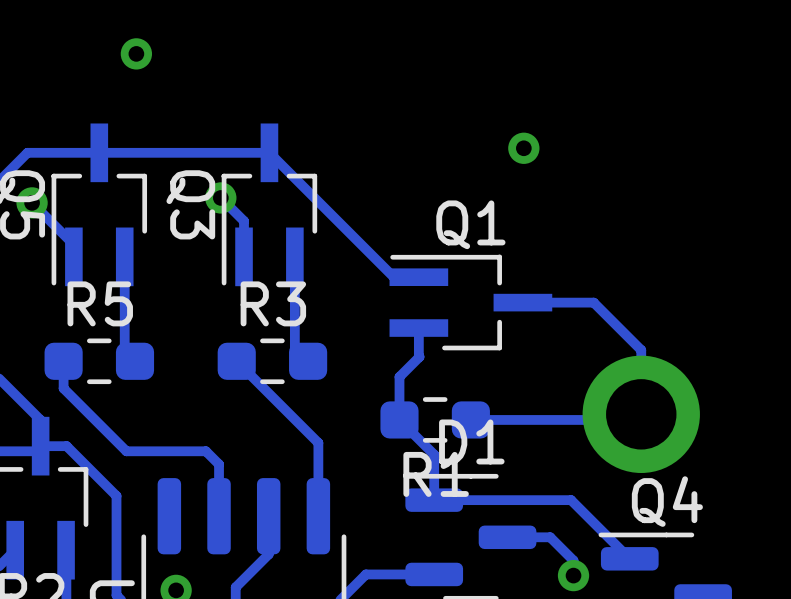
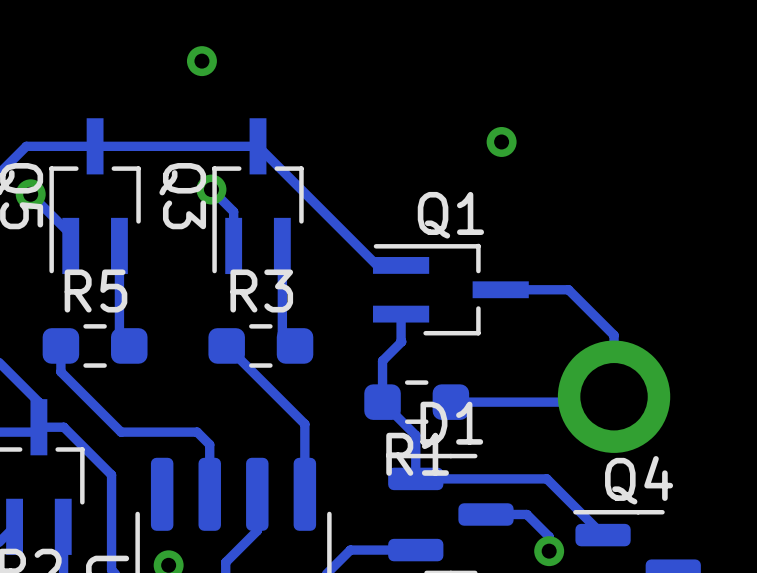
via position: (136, 53) -> (201, 61)

